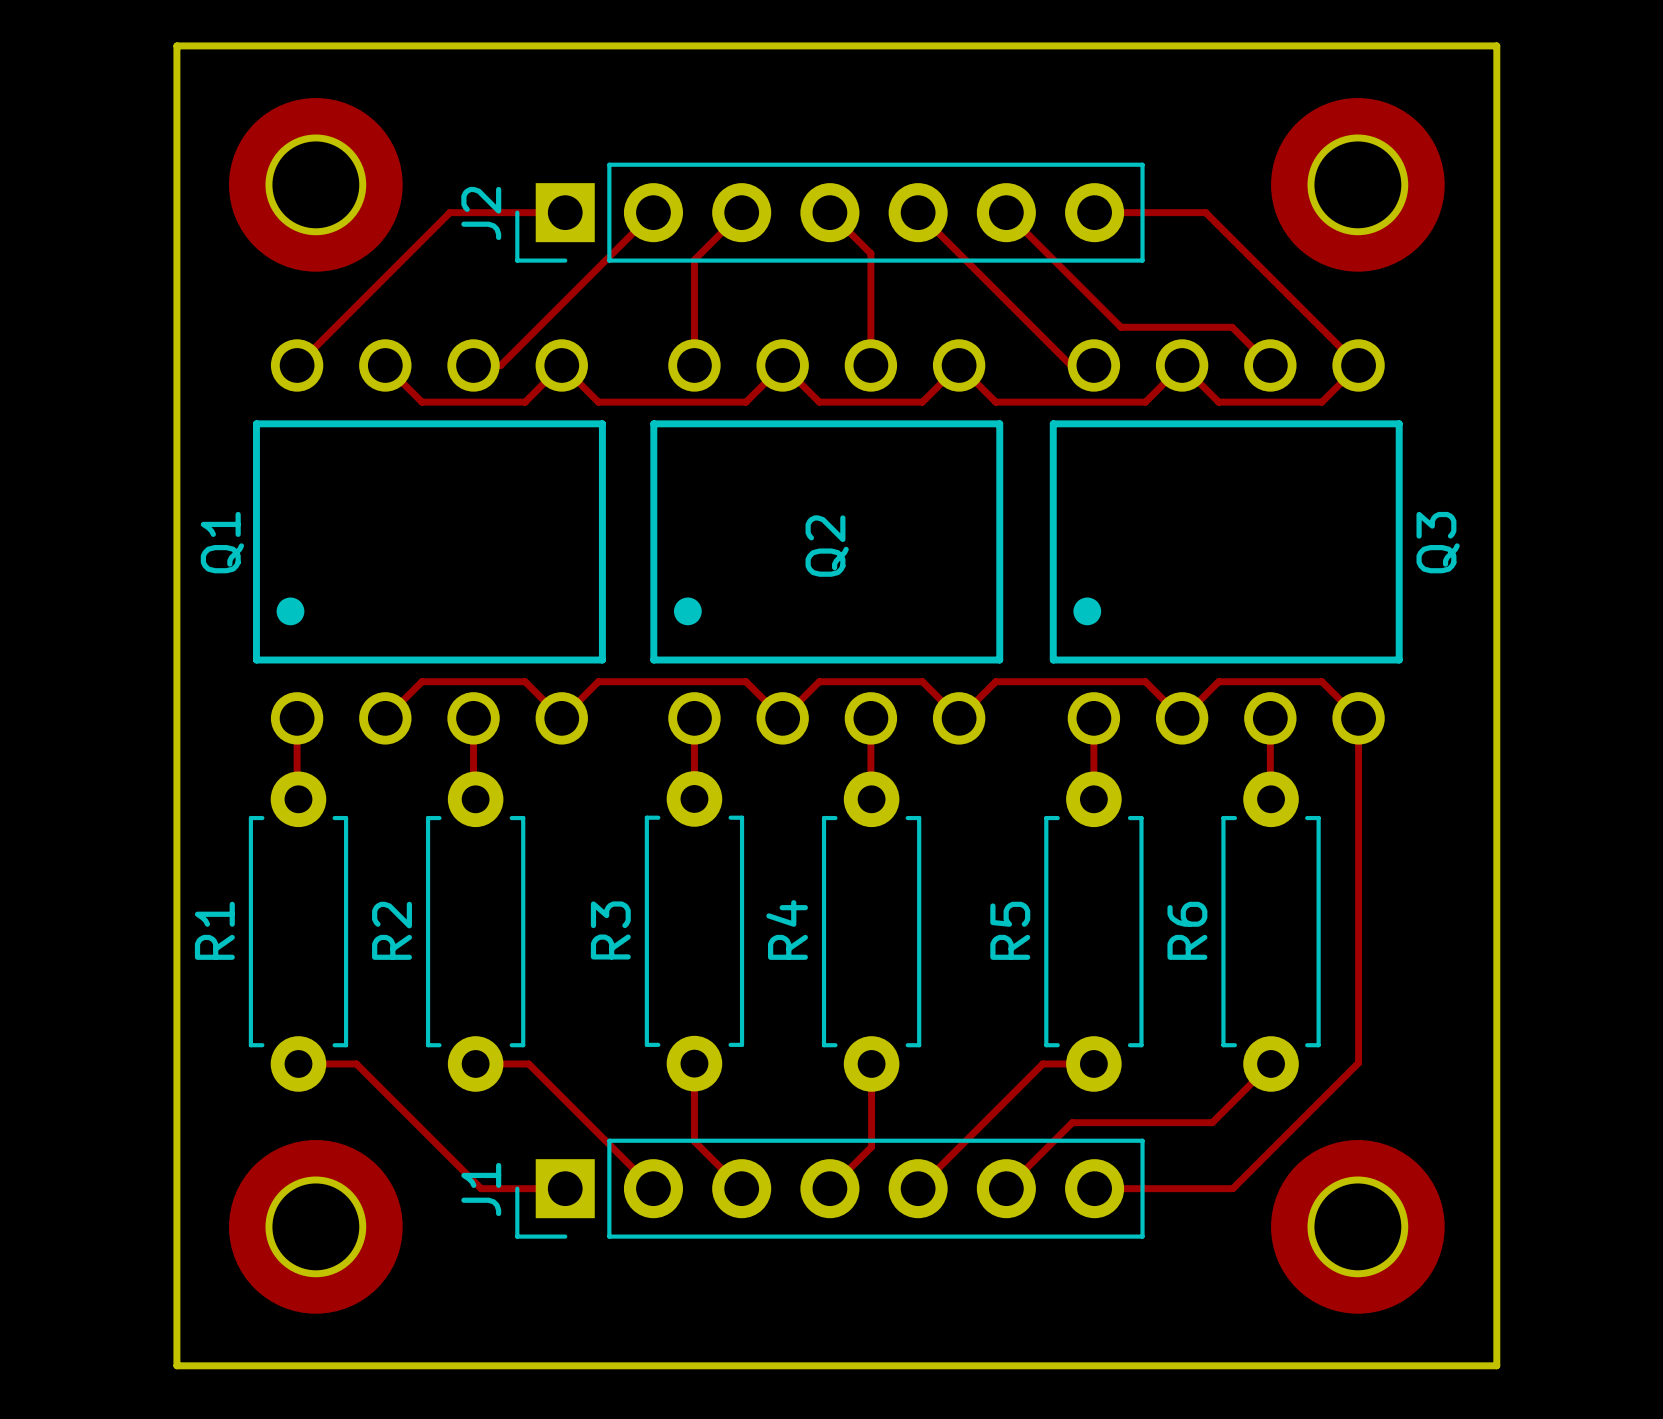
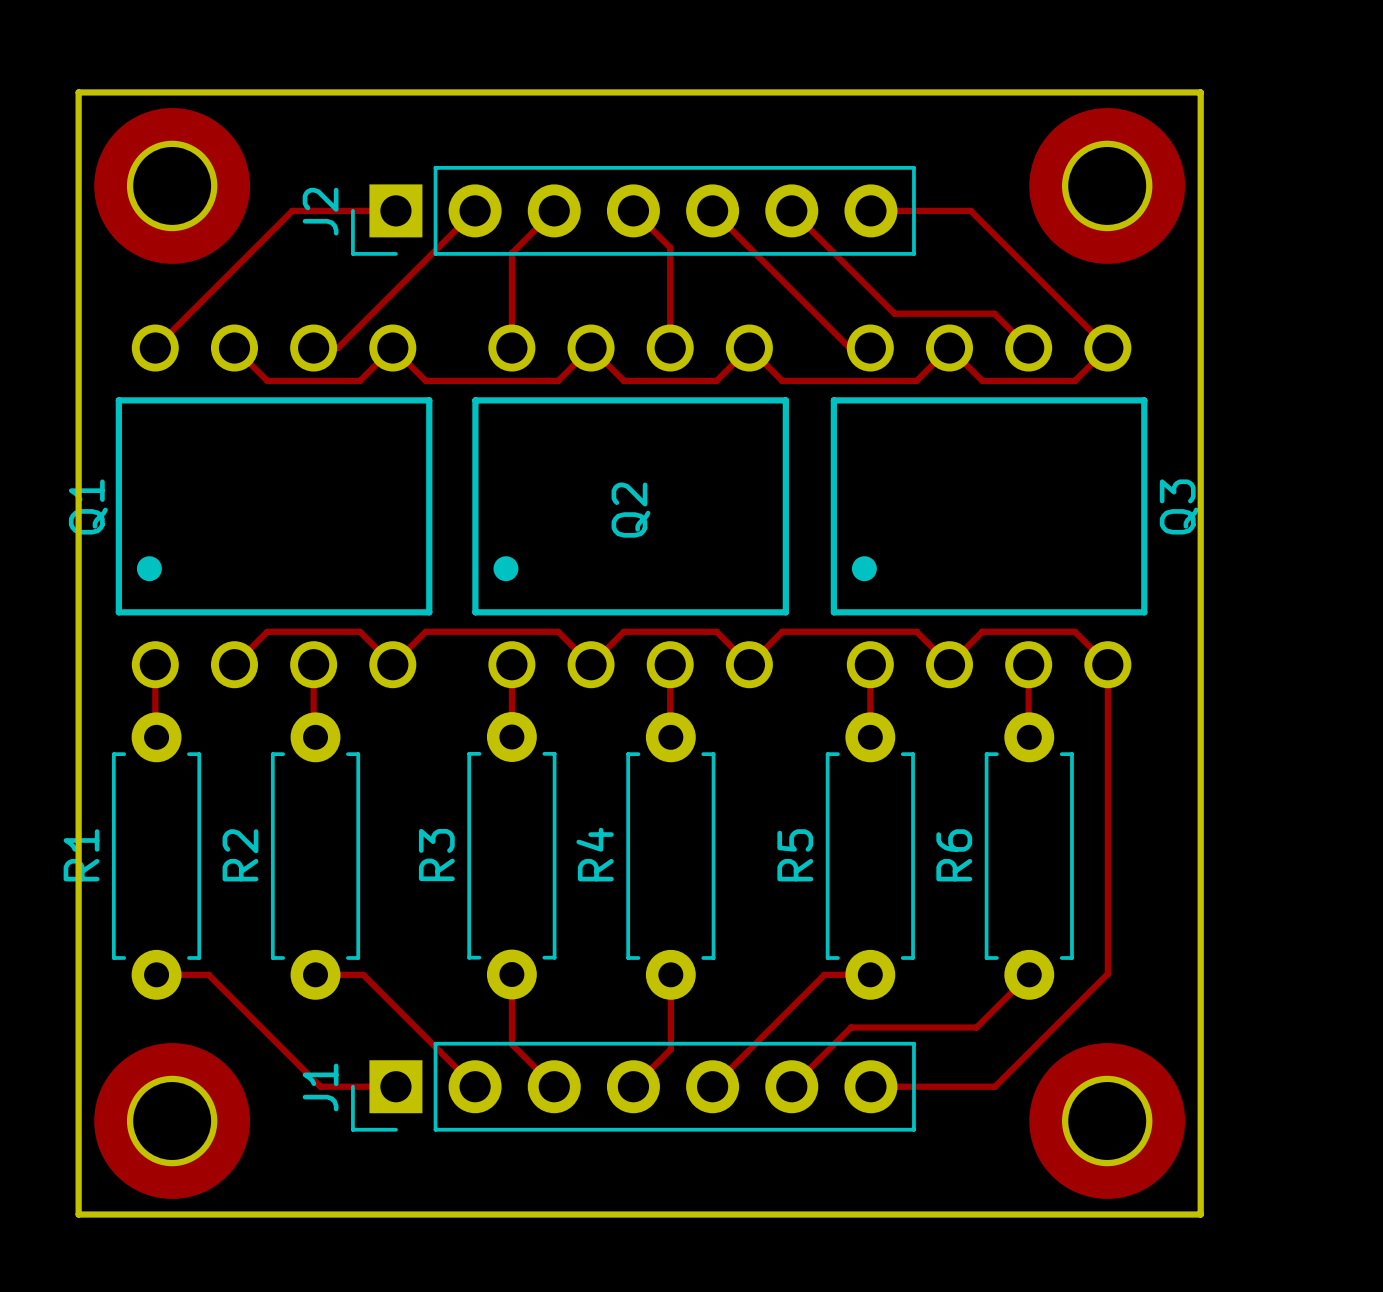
board edge: (176, 45) (1496, 45) (1496, 1365) (176, 1365) (176, 45) -> (78, 92) (78, 1214) (1200, 1214) (1200, 92) (78, 92)

